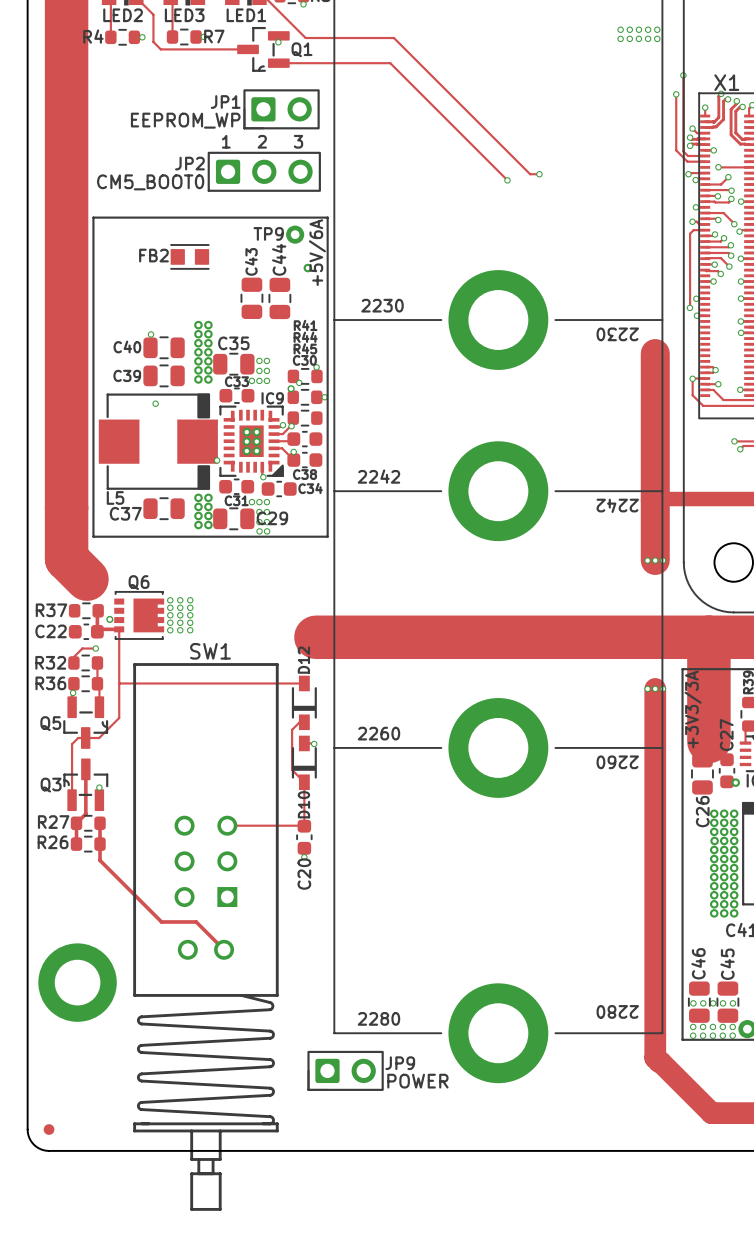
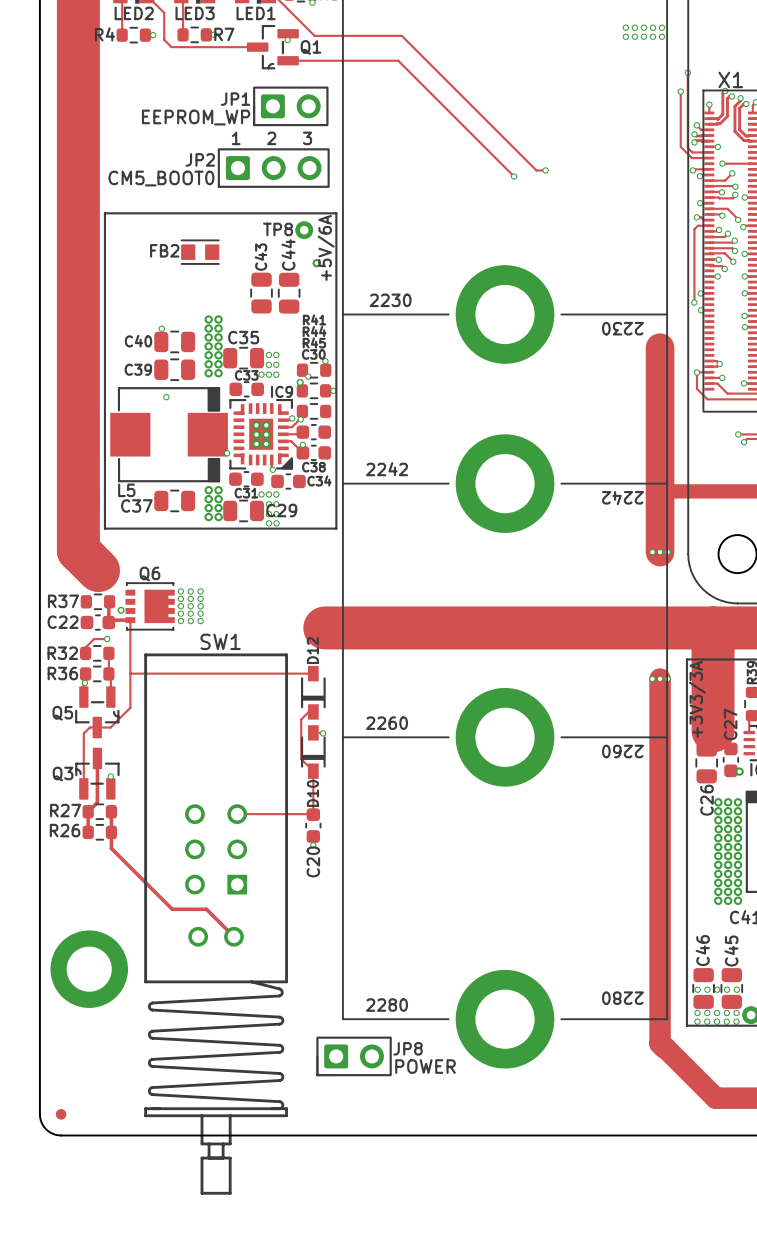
TP9 name: TP9 (268, 233) -> TP8 (278, 229)
JP9 name: JP9 (400, 1063) -> JP8 (408, 1048)

